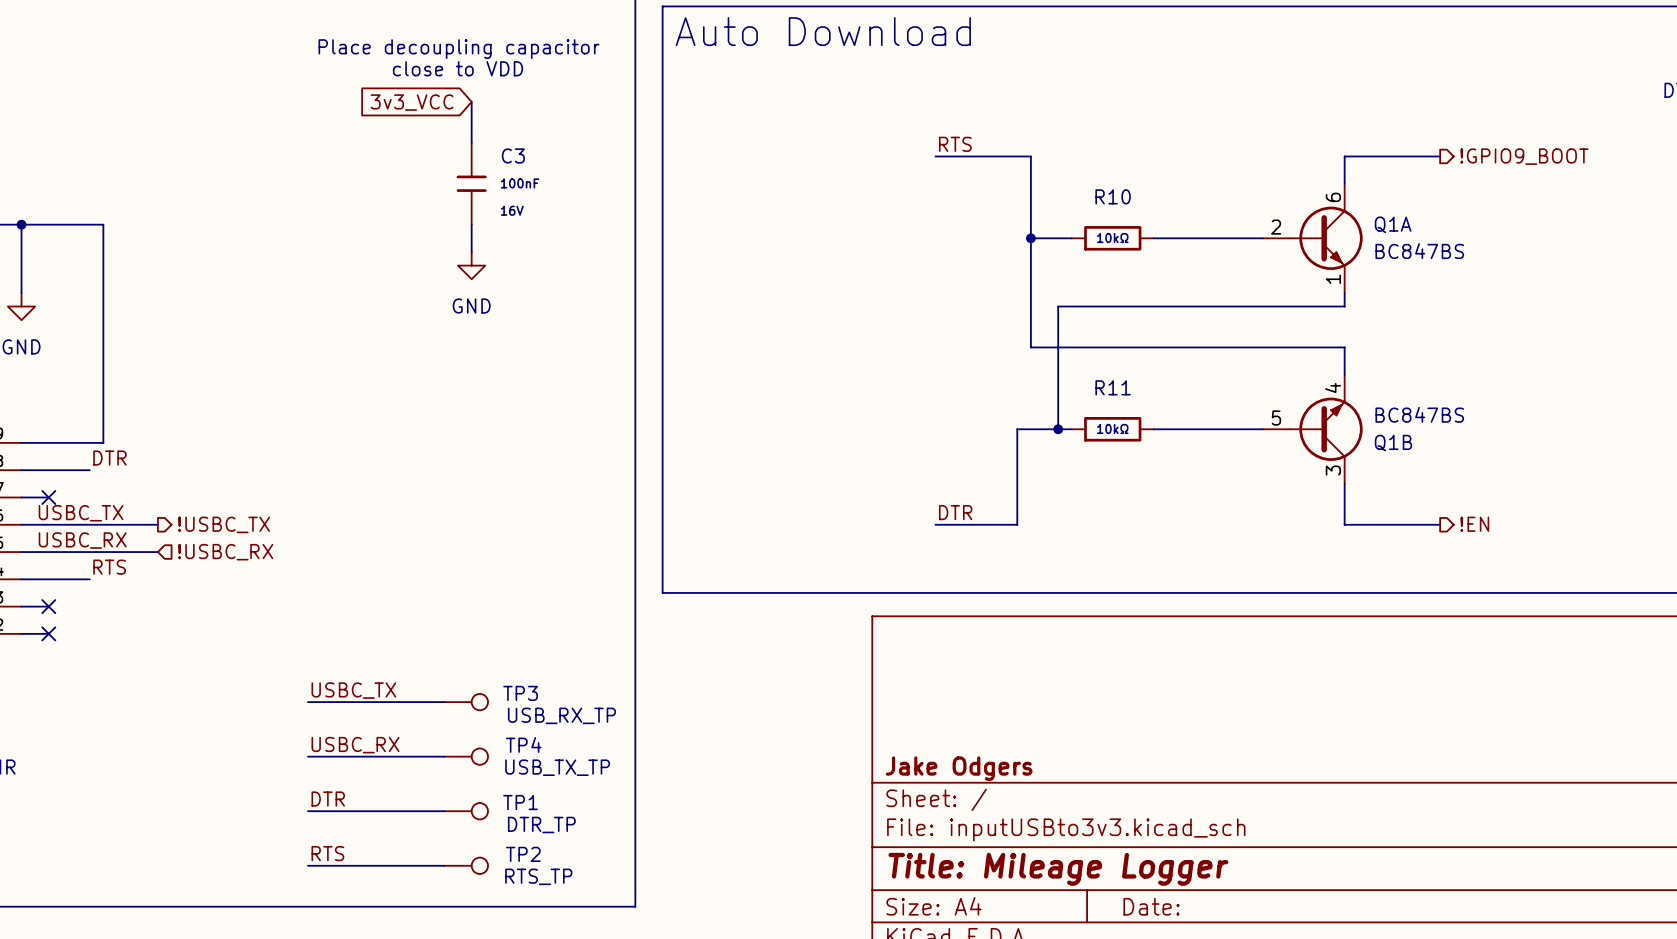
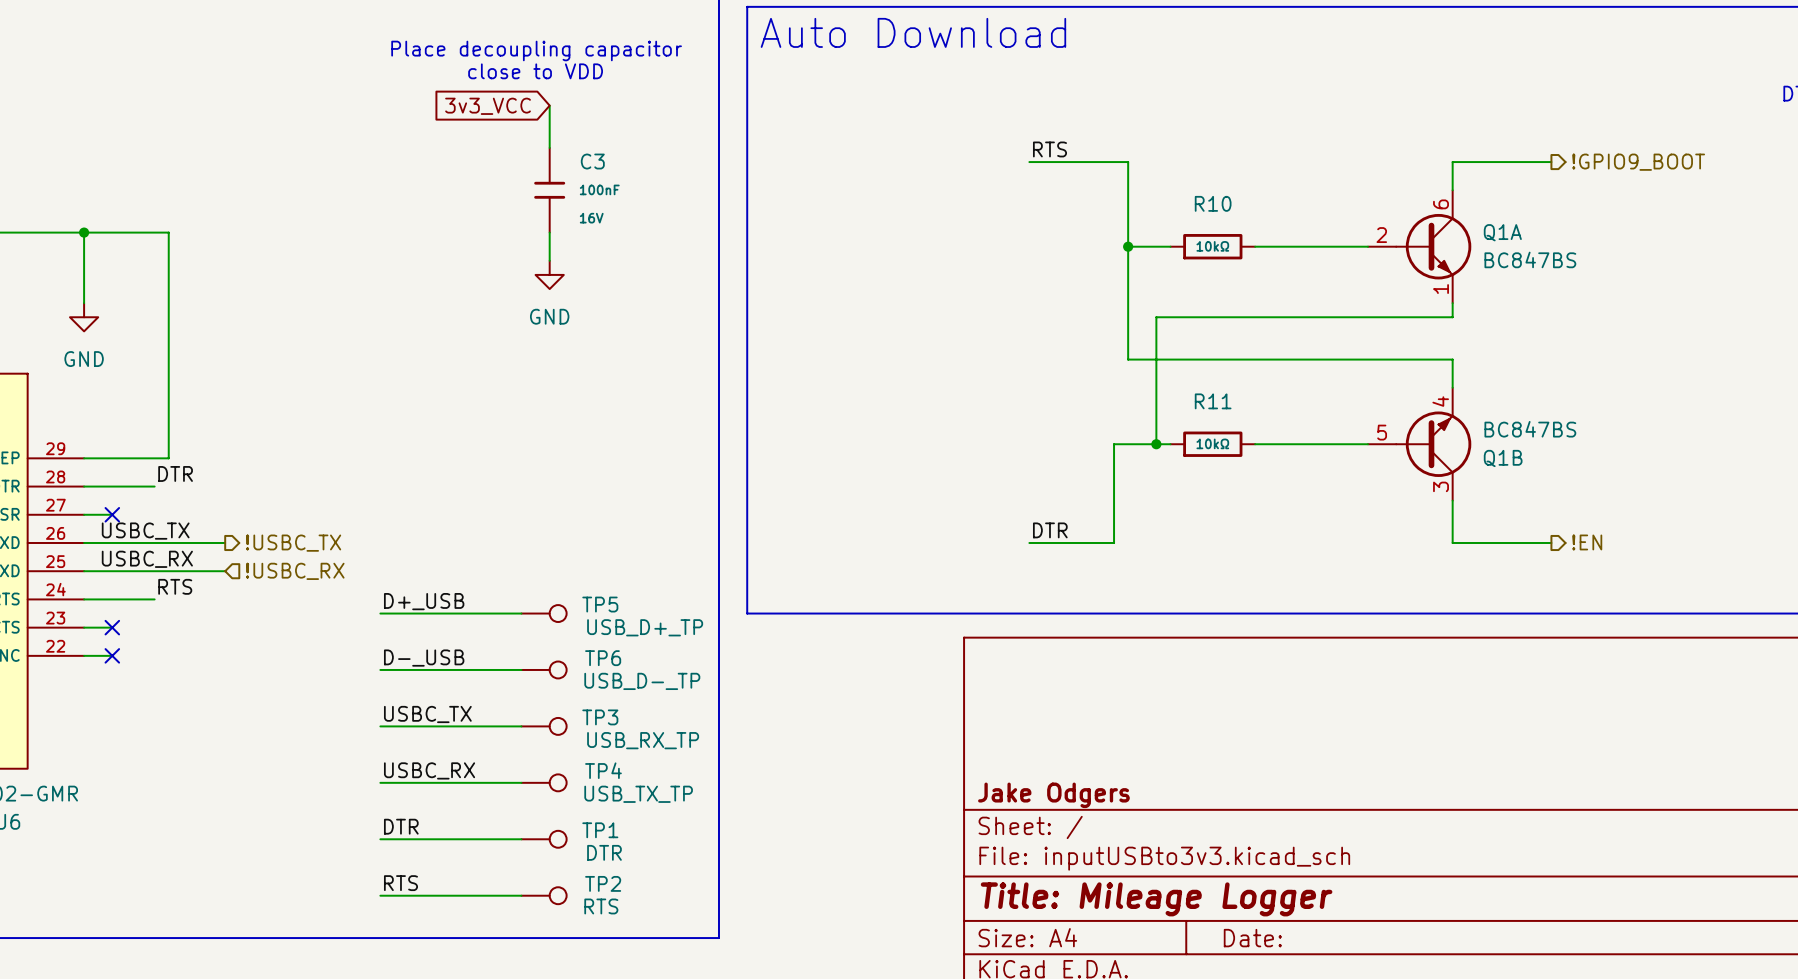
label: none -> D+_USB (424, 601)
wire: none -> (380, 613) (521, 613)
TP5: none -> USB_D+_TP (544, 613)
label: none -> D-_USB (424, 658)
wire: none -> (380, 669) (521, 669)
TP6: none -> USB_D-_TP (544, 669)
TP1 value: DTR_TP (541, 824) -> DTR (604, 852)
TP2 value: RTS_TP (538, 876) -> RTS (601, 906)

